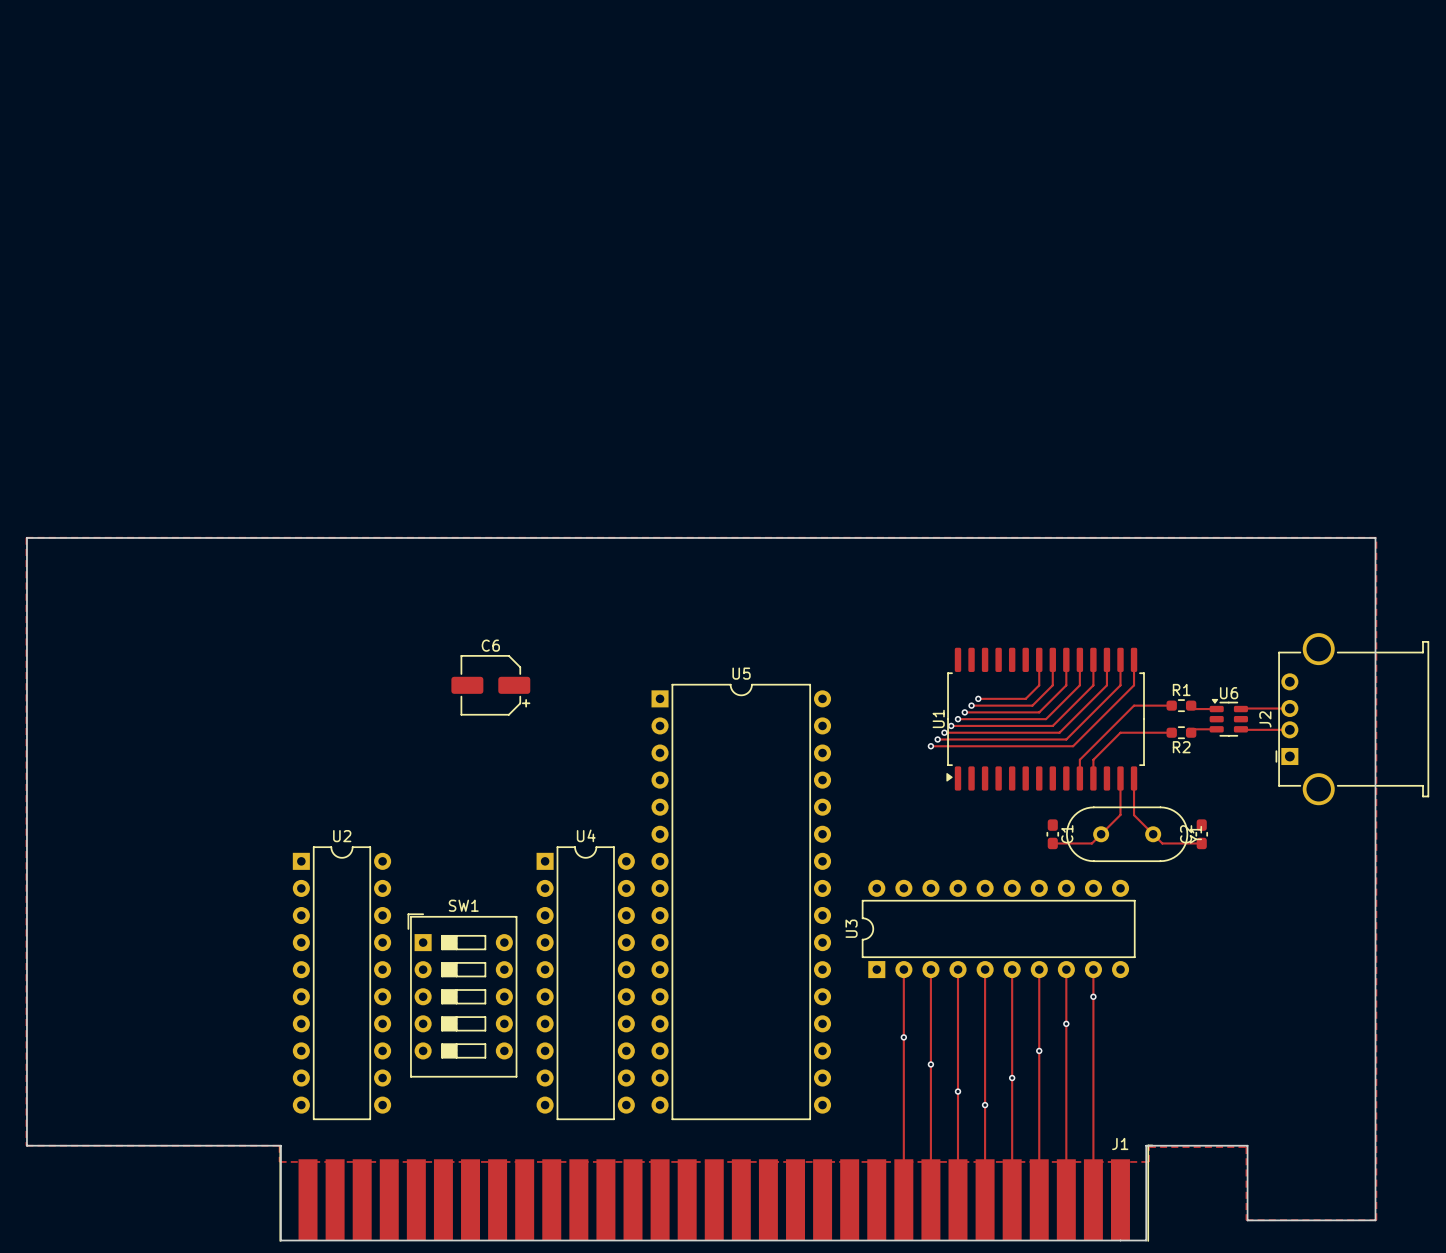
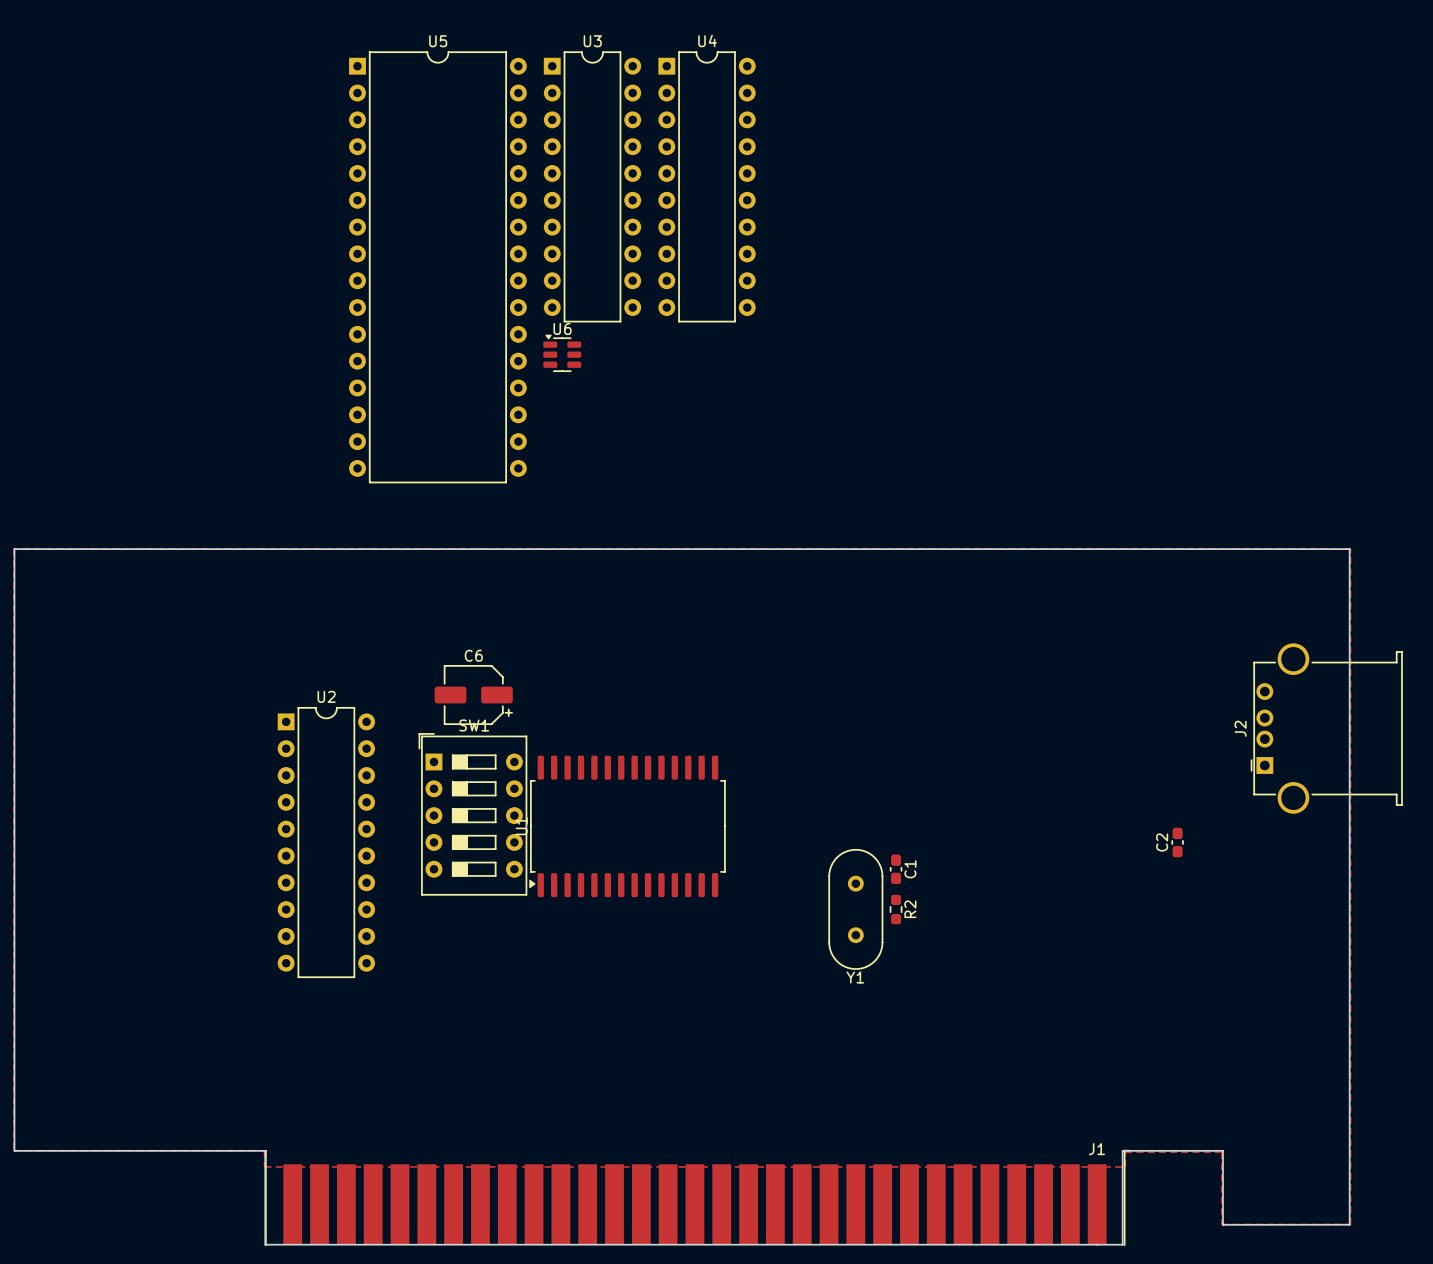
track: (1039, 659) (1039, 685) (1025, 698) (978, 698) -> none
track: (1052, 659) (1052, 685) (1032, 705) (971, 705) -> none
track: (1066, 659) (1066, 685) (1039, 712) (964, 712) -> none
track: (1079, 659) (1079, 685) (1046, 719) (958, 719) -> none
track: (1093, 659) (1093, 685) (1052, 725) (951, 725) -> none
track: (1106, 659) (1106, 685) (1059, 732) (944, 732) -> none
track: (1120, 659) (1120, 685) (1066, 739) (937, 739) -> none
track: (1134, 659) (1134, 685) (1073, 746) (930, 746) -> none
via: (978, 698) -> none
via: (971, 705) -> none
track: (1171, 705) (1134, 705) (1079, 759) (1079, 778) -> none
R1: (1181, 705) -> none
track: (1191, 705) (1194, 709) (1216, 709) -> none
track: (1289, 708) (1240, 709) -> none
via: (964, 712) -> none
U6 position: (1228, 717) -> (562, 353)
via: (958, 719) -> none
U1 position: (1045, 719) -> (627, 826)
via: (951, 725) -> none
track: (1216, 729) (1194, 729) (1191, 732) -> none
track: (1240, 729) (1289, 729) -> none
via: (944, 732) -> none
track: (1171, 732) (1120, 732) (1093, 759) (1093, 778) -> none
R2 rotation: 0° (1181, 732) -> 90° clockwise (896, 909)
R2 position: (1181, 732) -> (896, 909)
via: (937, 739) -> none
via: (930, 746) -> none
track: (1120, 778) (1120, 814) (1091, 843) (1052, 843) -> none
track: (1134, 778) (1134, 815) (1162, 843) (1201, 843) -> none
C1 position: (1052, 834) -> (896, 869)
Y1 rotation: 0° (1127, 834) -> 90° clockwise (855, 909)
Y1 position: (1127, 834) -> (855, 909)
U5 position: (741, 901) -> (437, 267)
U3 rotation: 0° (998, 928) -> 90° clockwise (592, 186)
U3 position: (998, 928) -> (592, 186)
track: (903, 969) (903, 1199) -> none
track: (930, 969) (930, 1199) -> none
track: (958, 969) (958, 1199) -> none
track: (985, 969) (985, 1199) -> none
track: (1012, 969) (1012, 1199) -> none
track: (1039, 969) (1039, 1199) -> none
track: (1066, 969) (1066, 1199) -> none
track: (1093, 969) (1093, 1199) -> none
U2 position: (341, 983) -> (326, 842)
U4 position: (585, 983) -> (707, 186)
SW1 position: (462, 995) -> (472, 814)
via: (1093, 996) -> none
via: (1066, 1023) -> none
via: (903, 1037) -> none
via: (1039, 1050) -> none
via: (930, 1064) -> none
via: (1012, 1078) -> none
via: (958, 1091) -> none
via: (985, 1105) -> none

